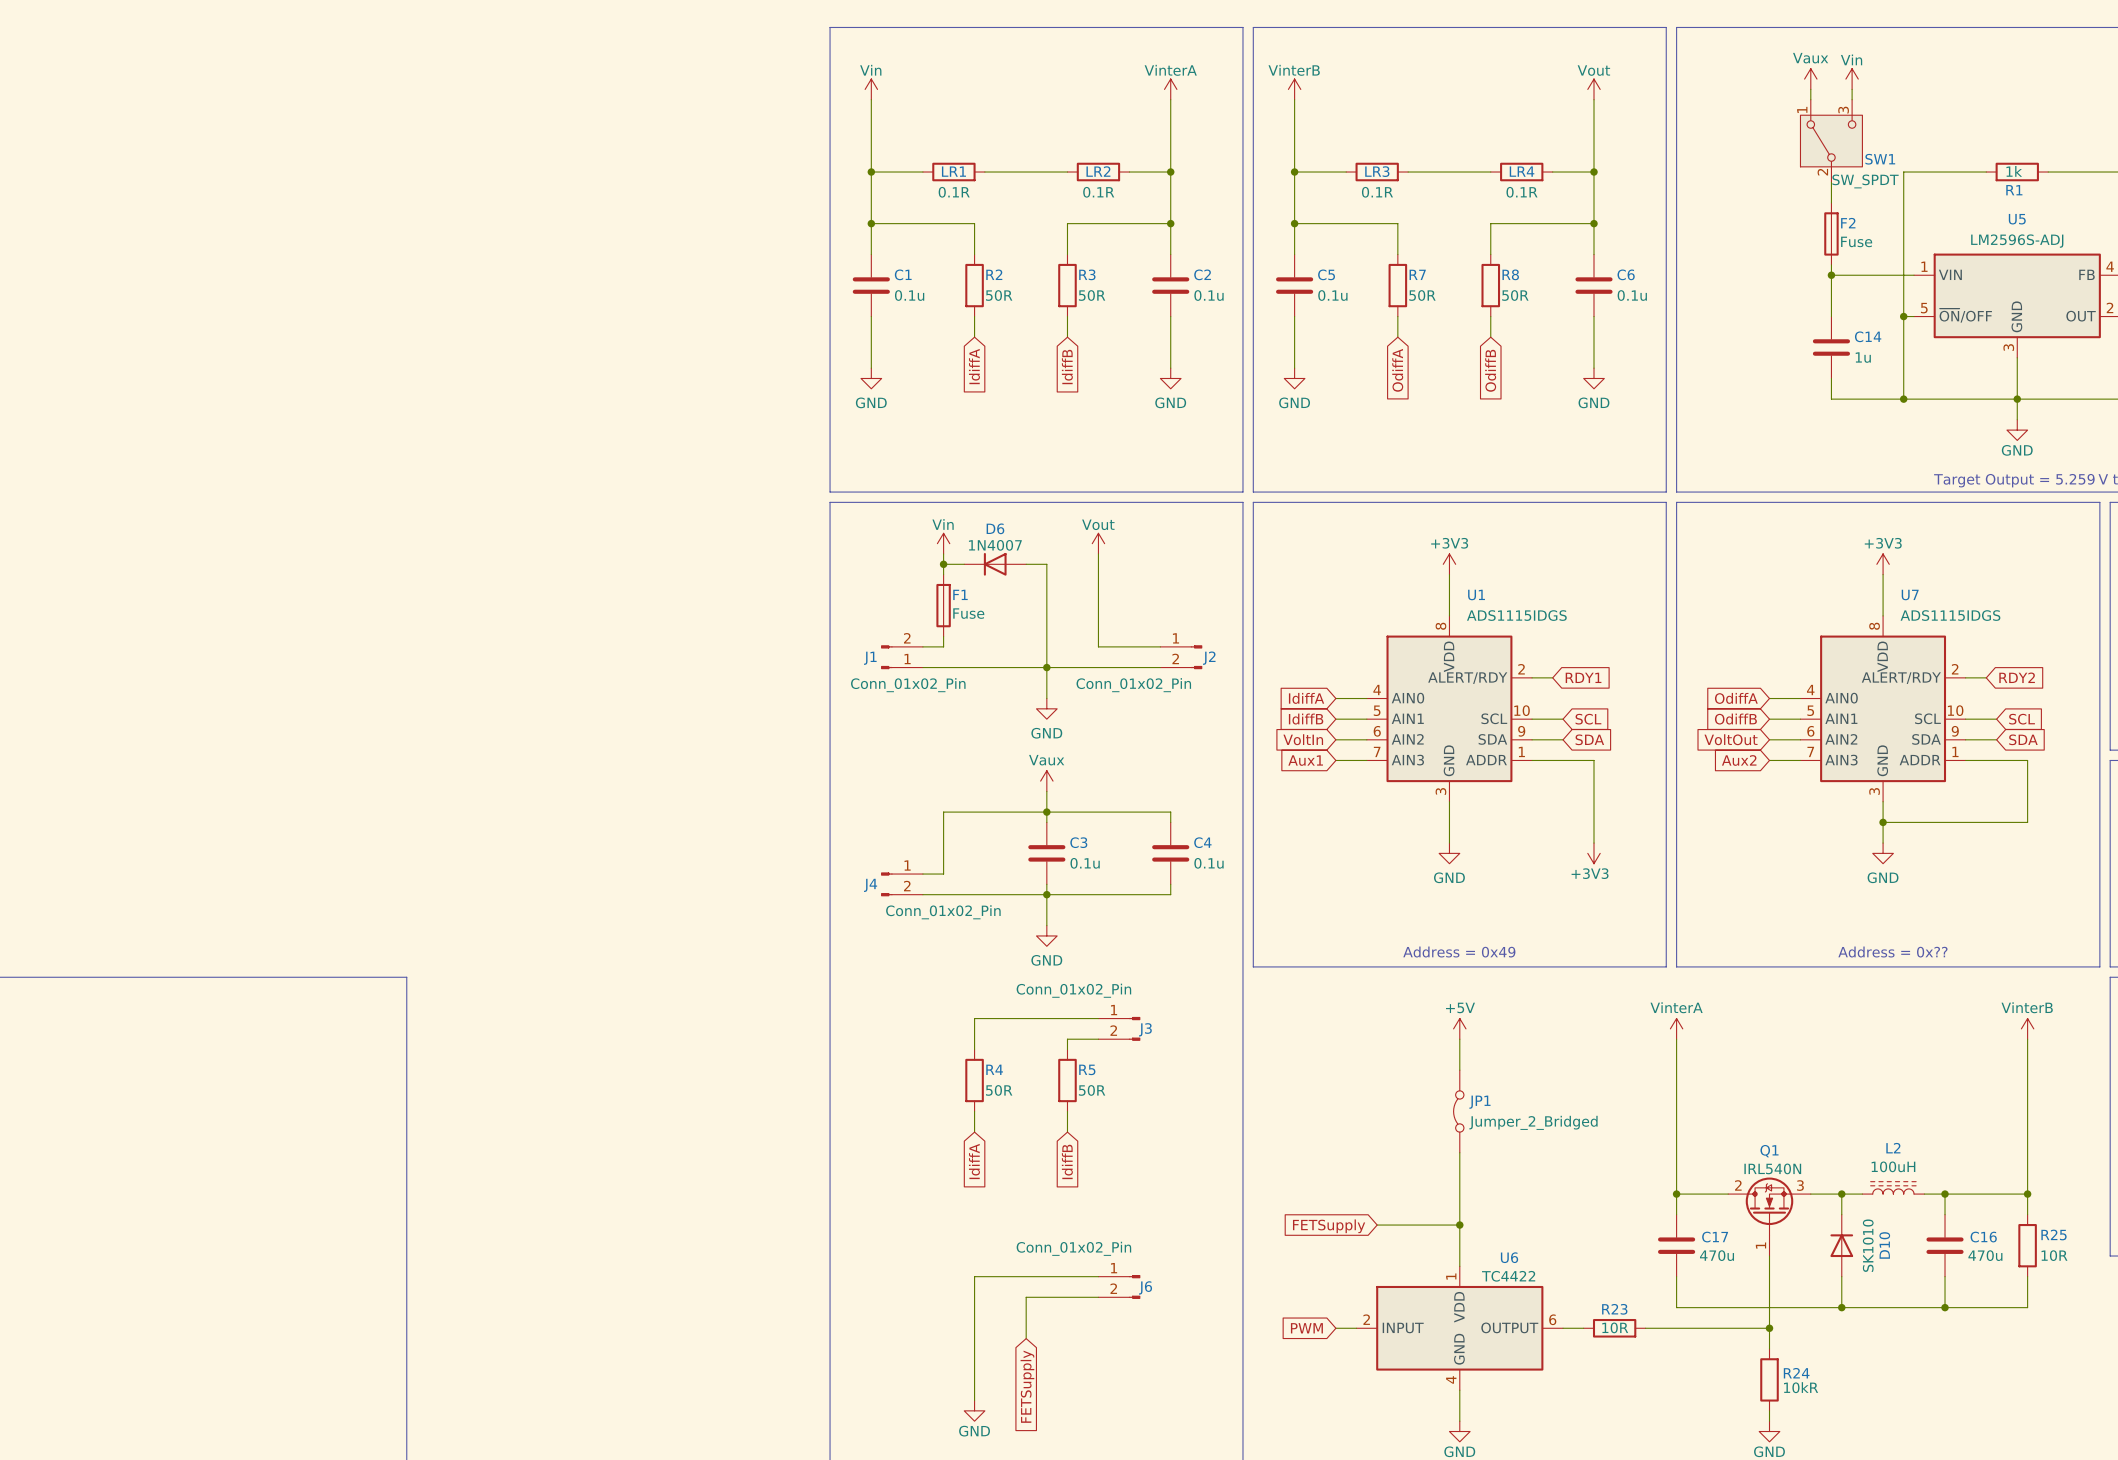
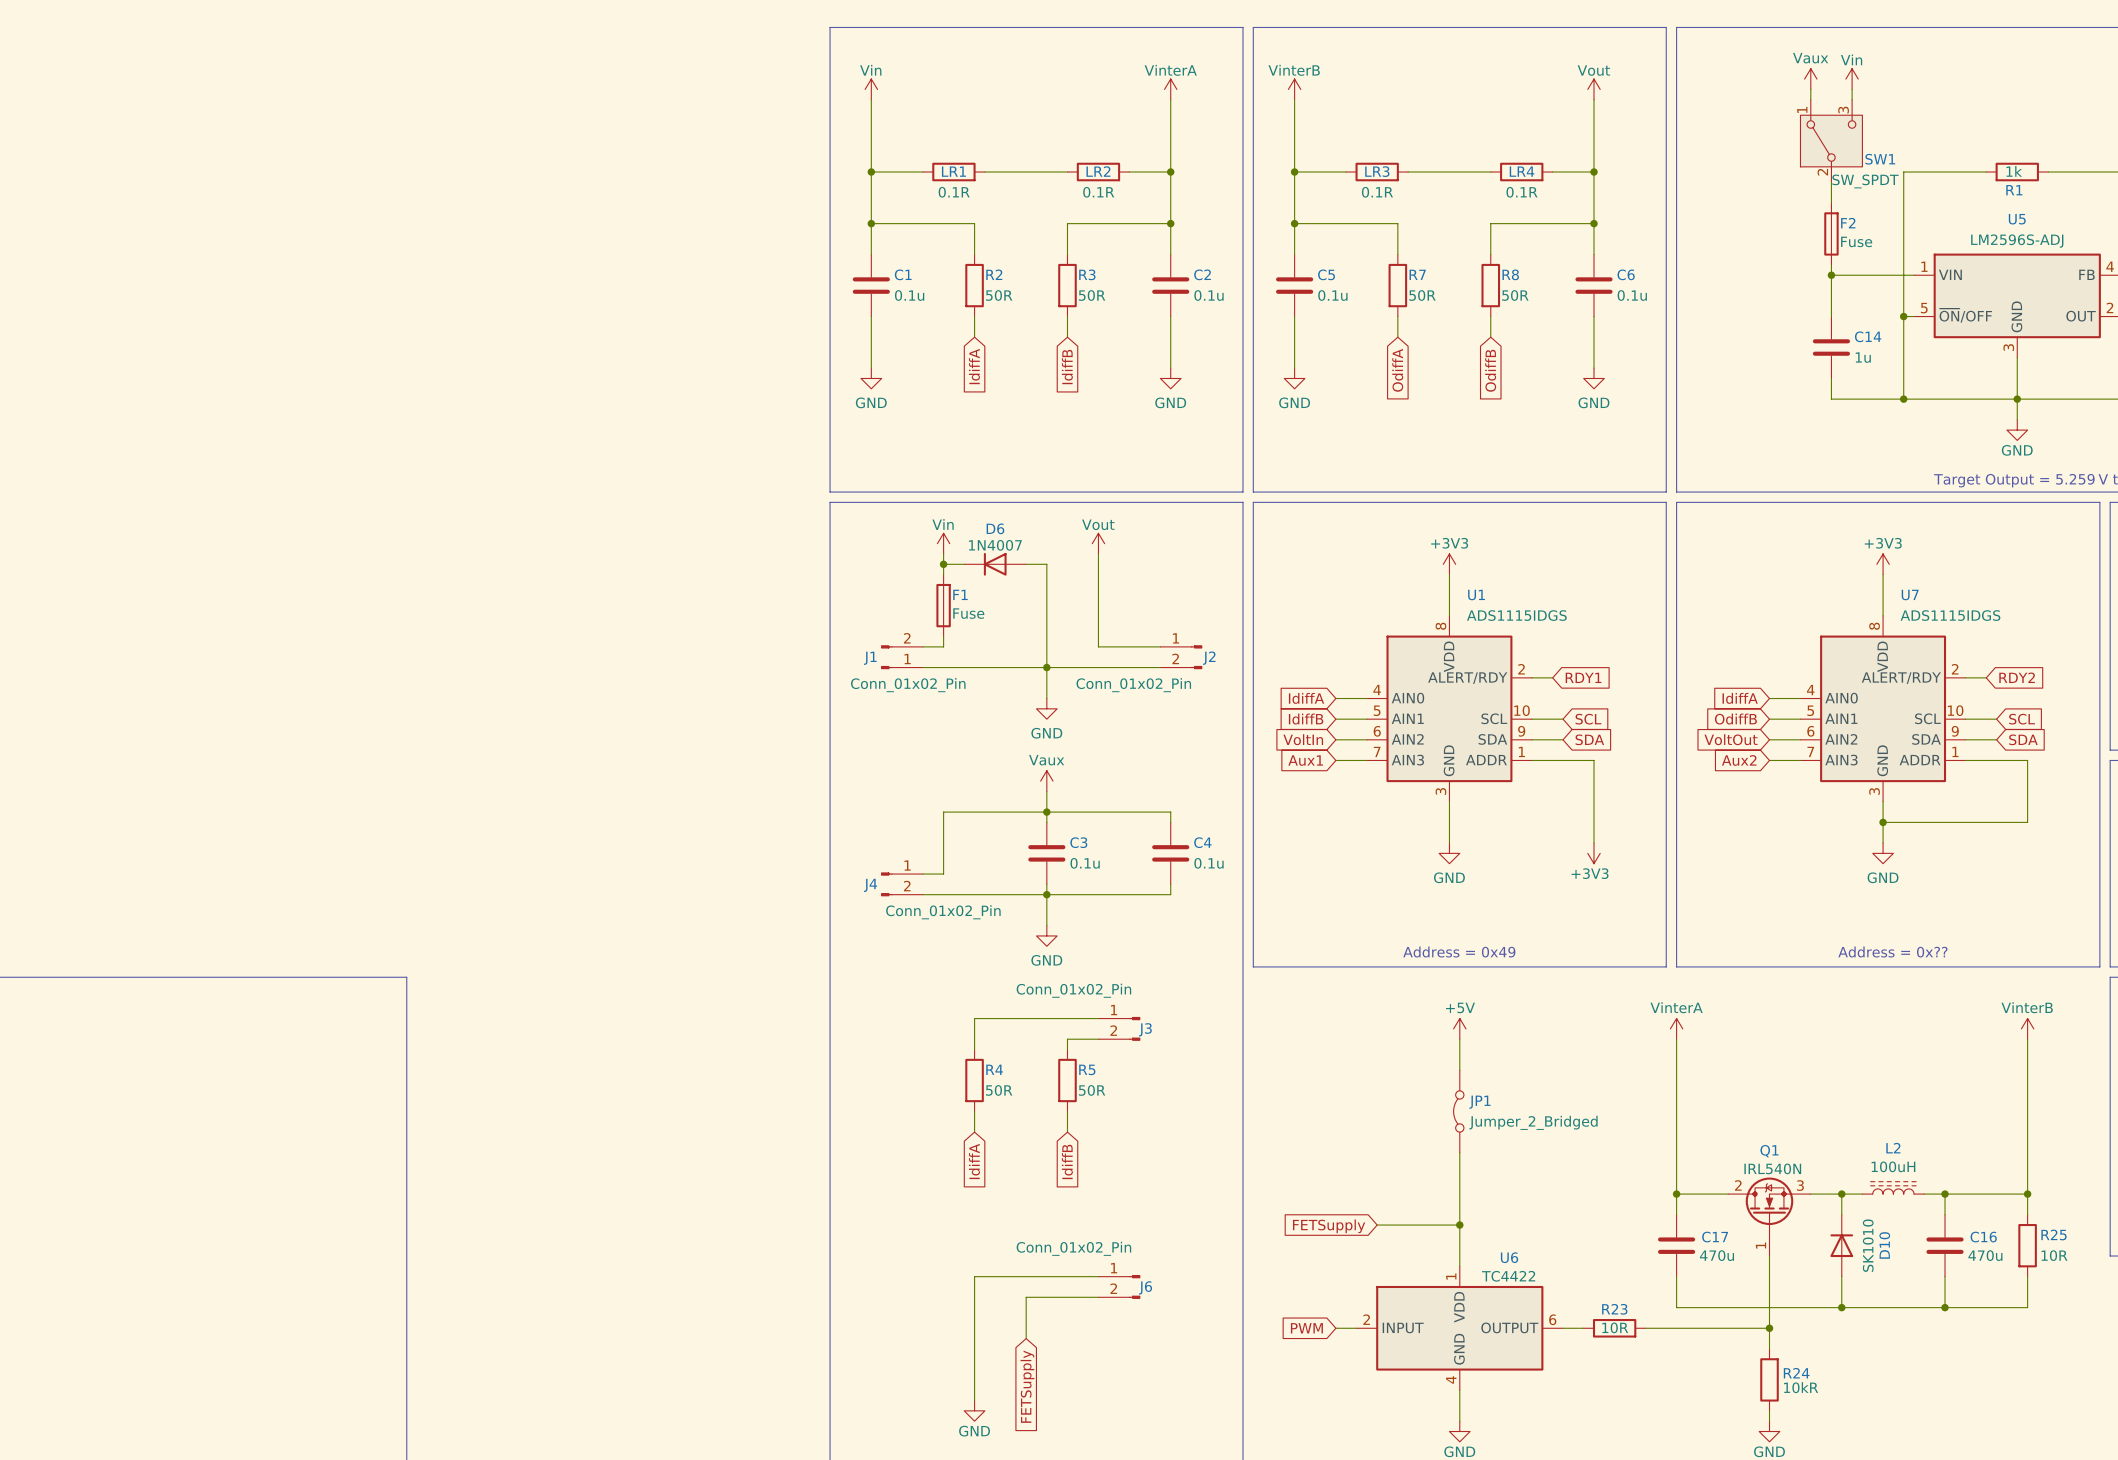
global label: OdiffA (1736, 698) -> IdiffA (1740, 698)

